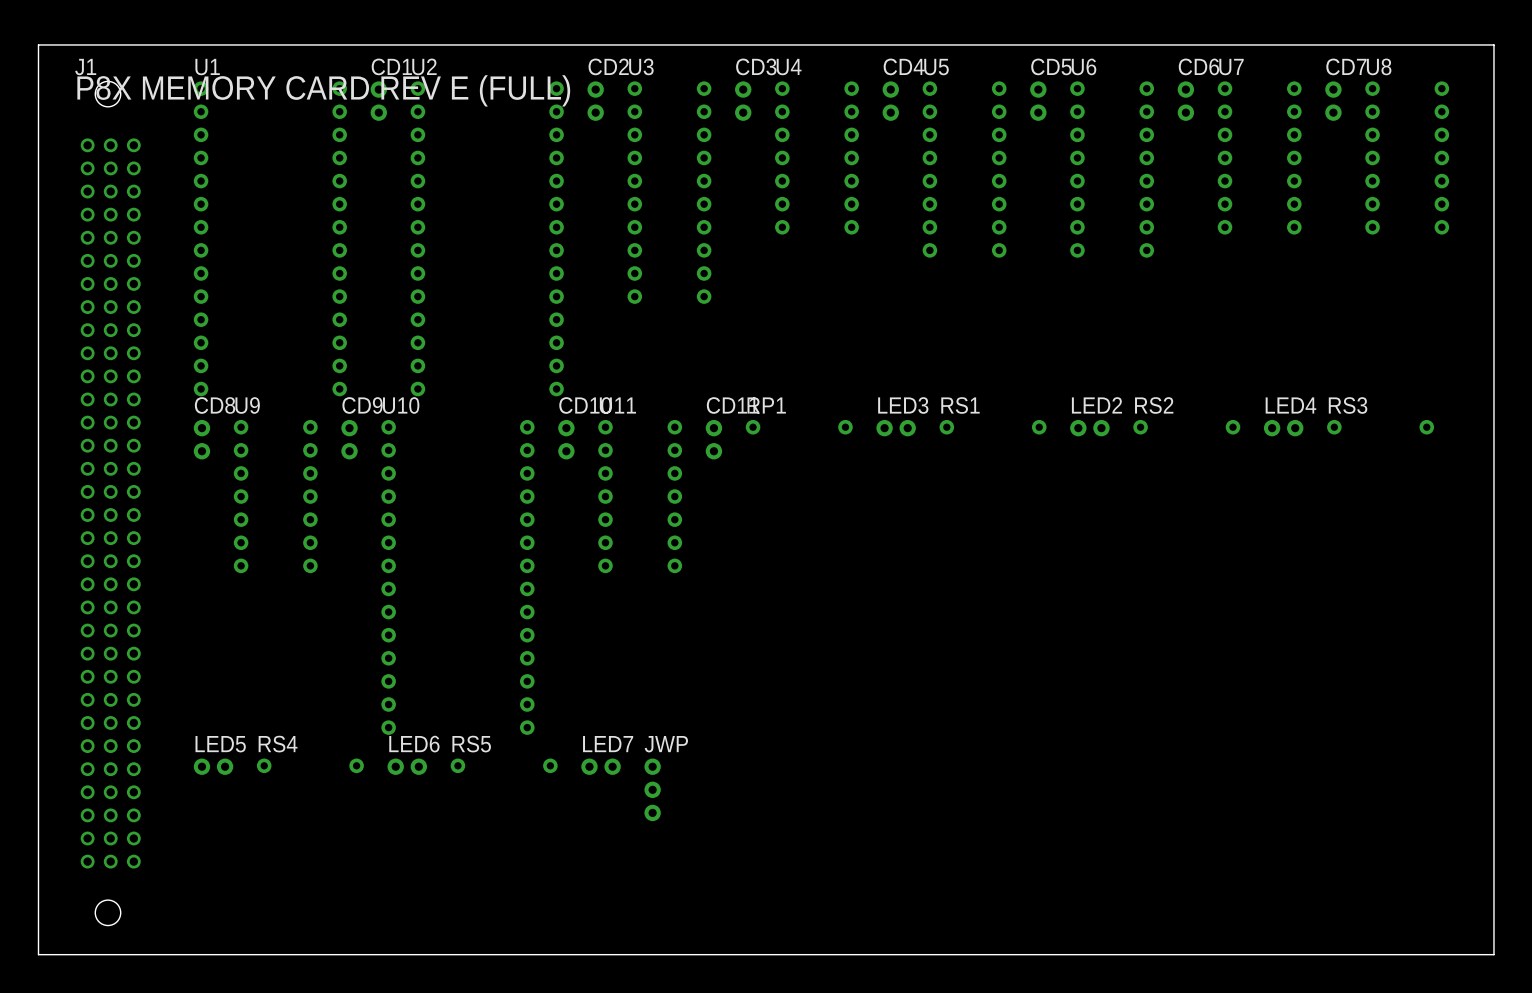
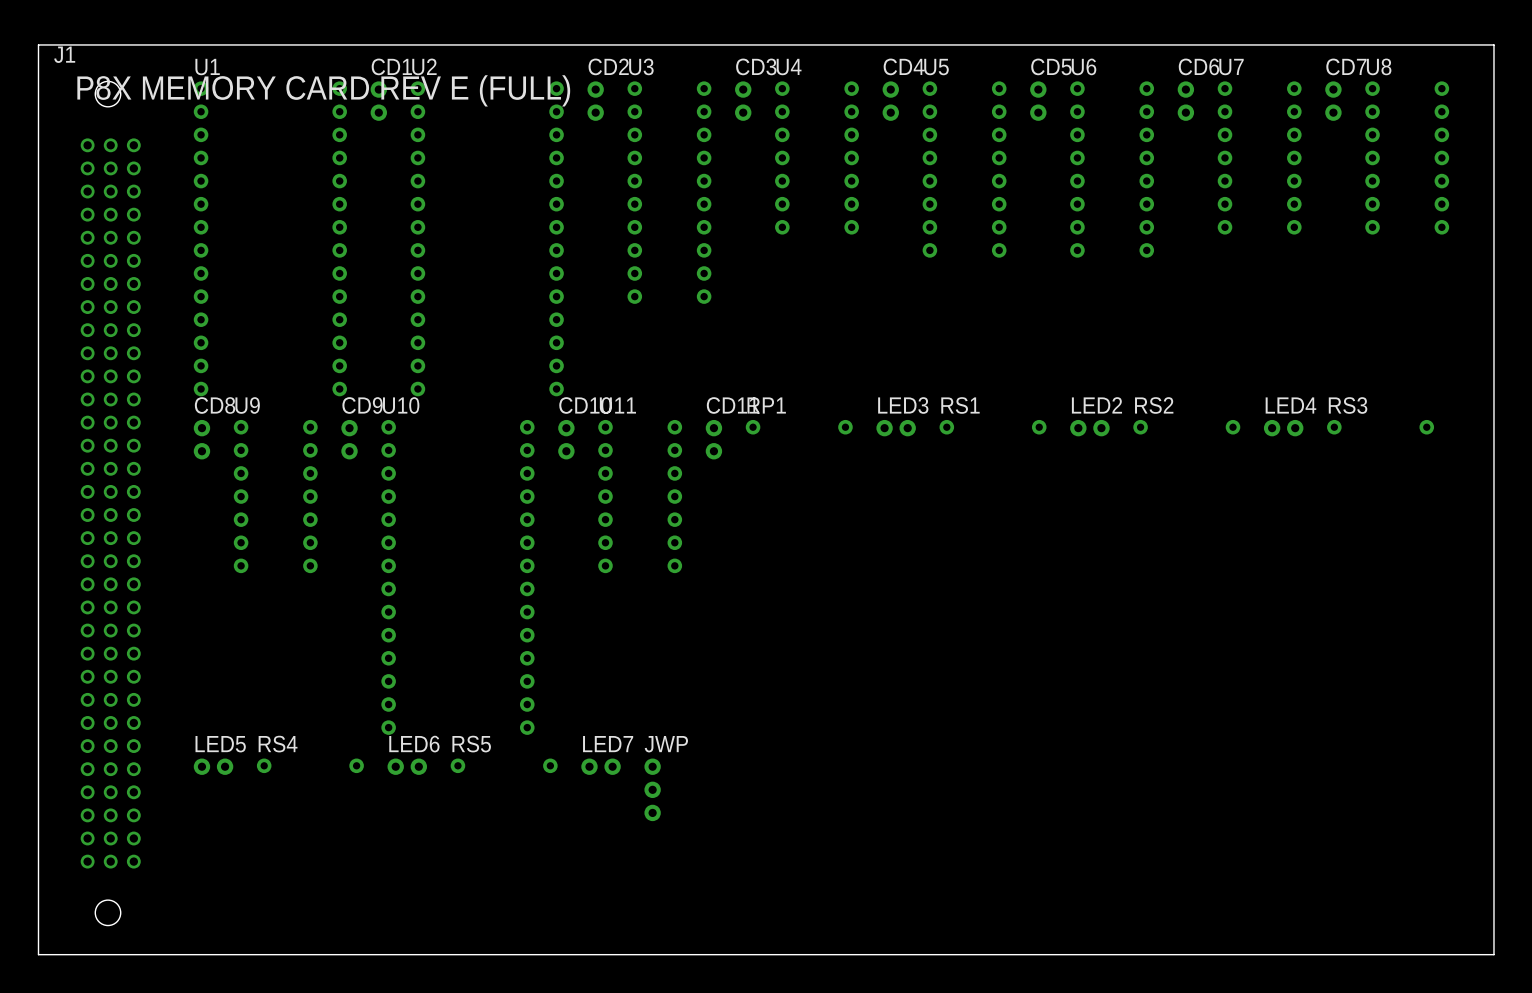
J1 name position: J1 (85, 67) -> J1 (64, 54)

